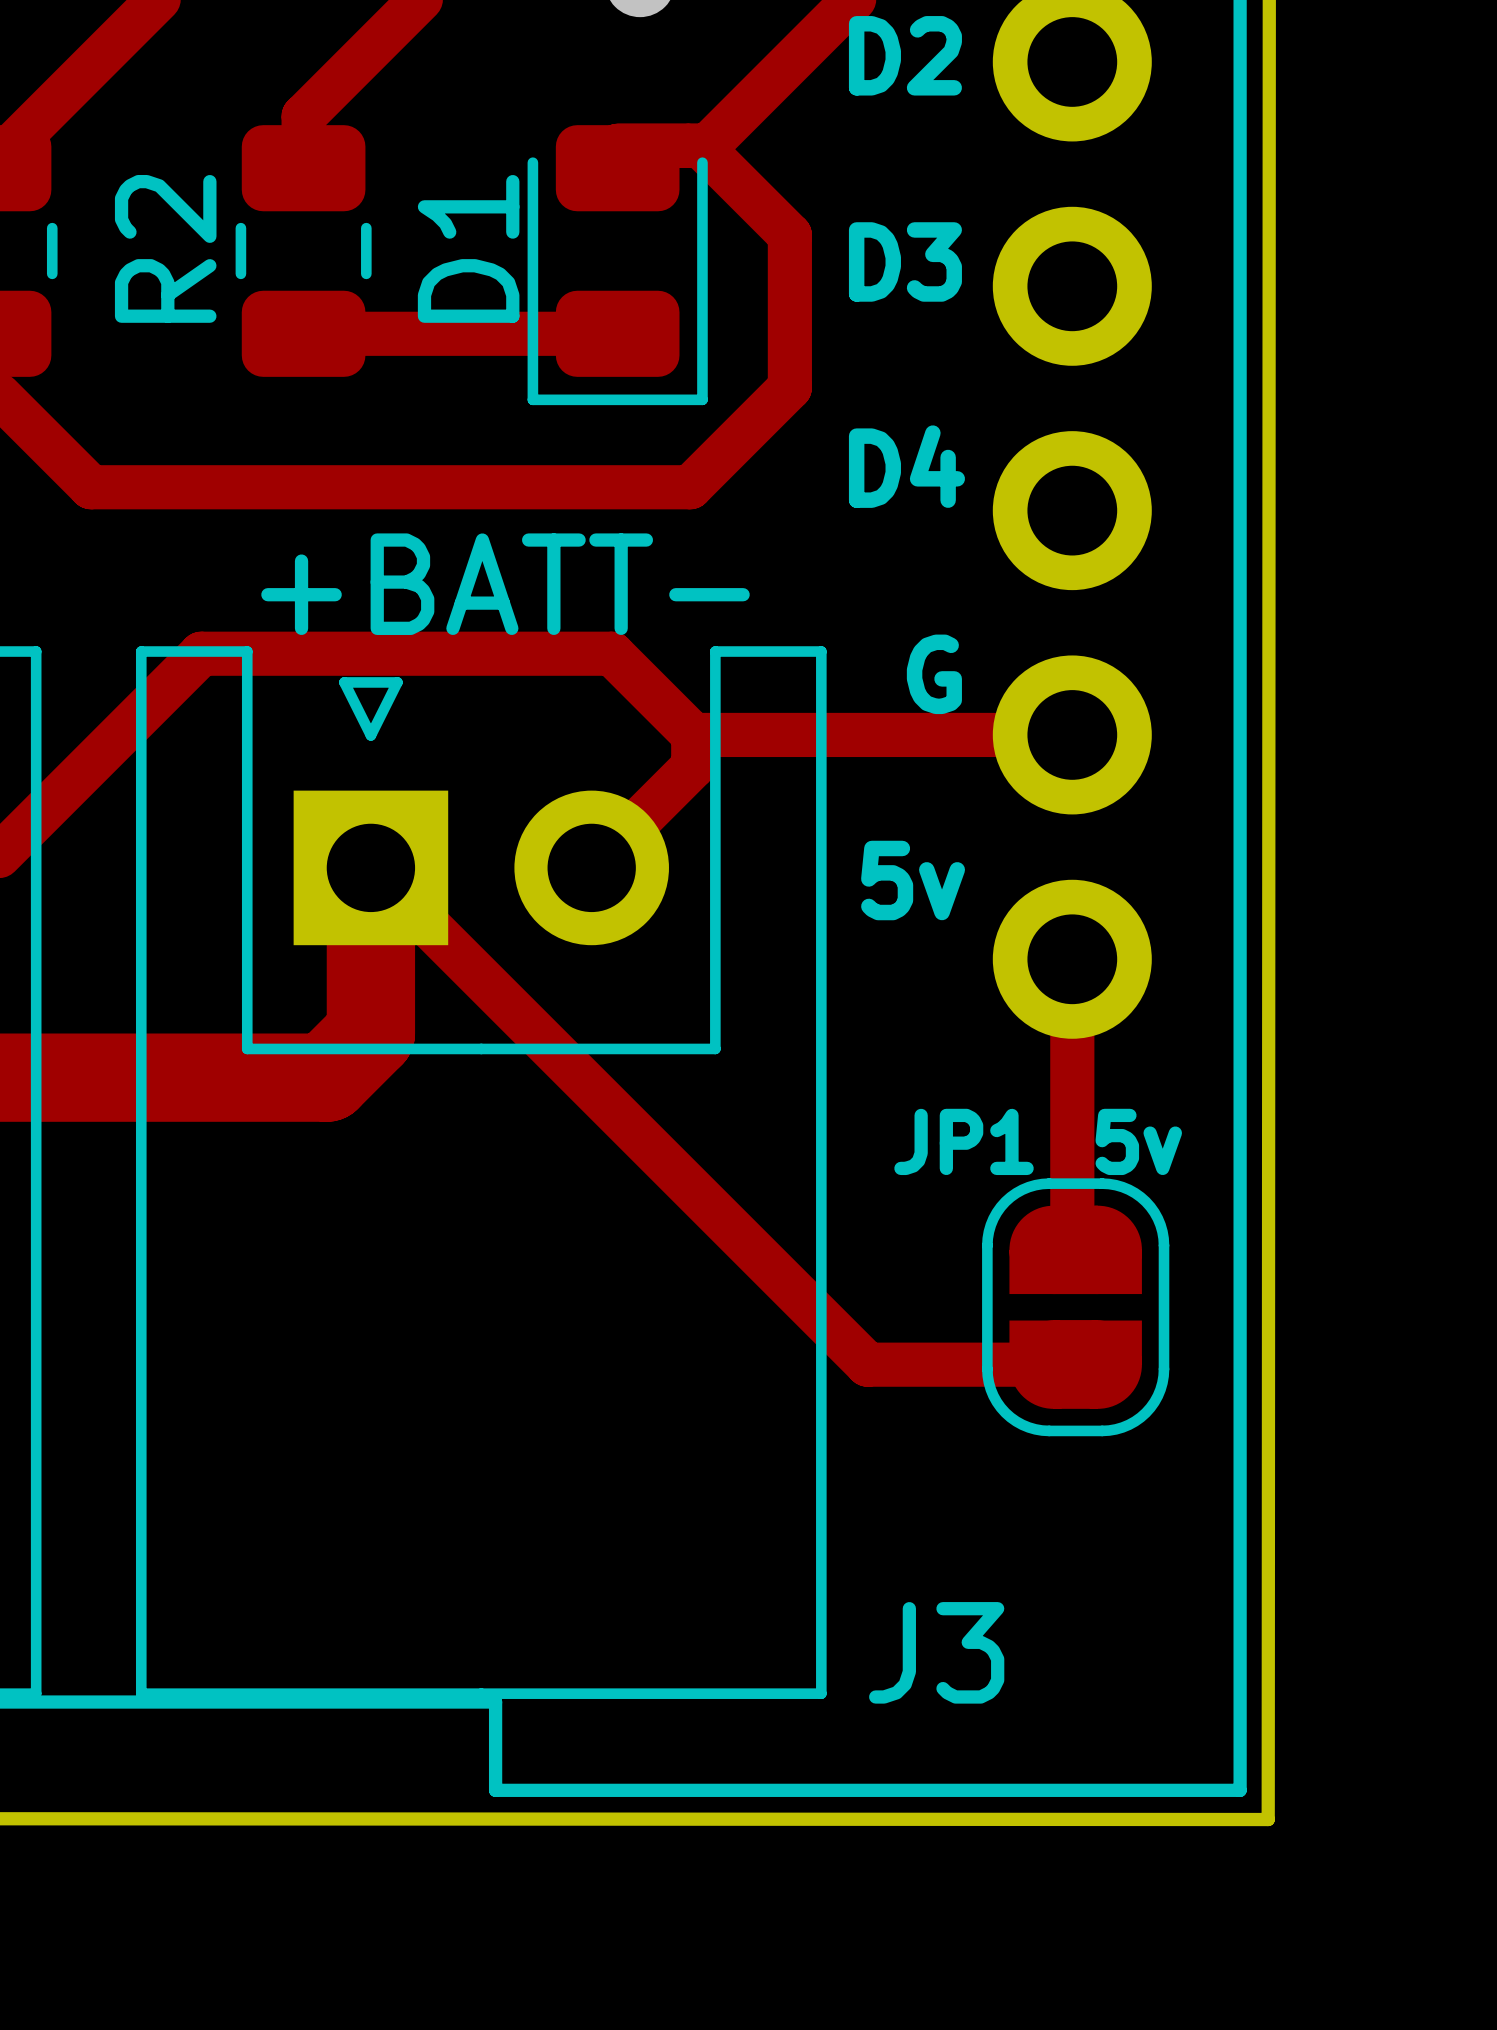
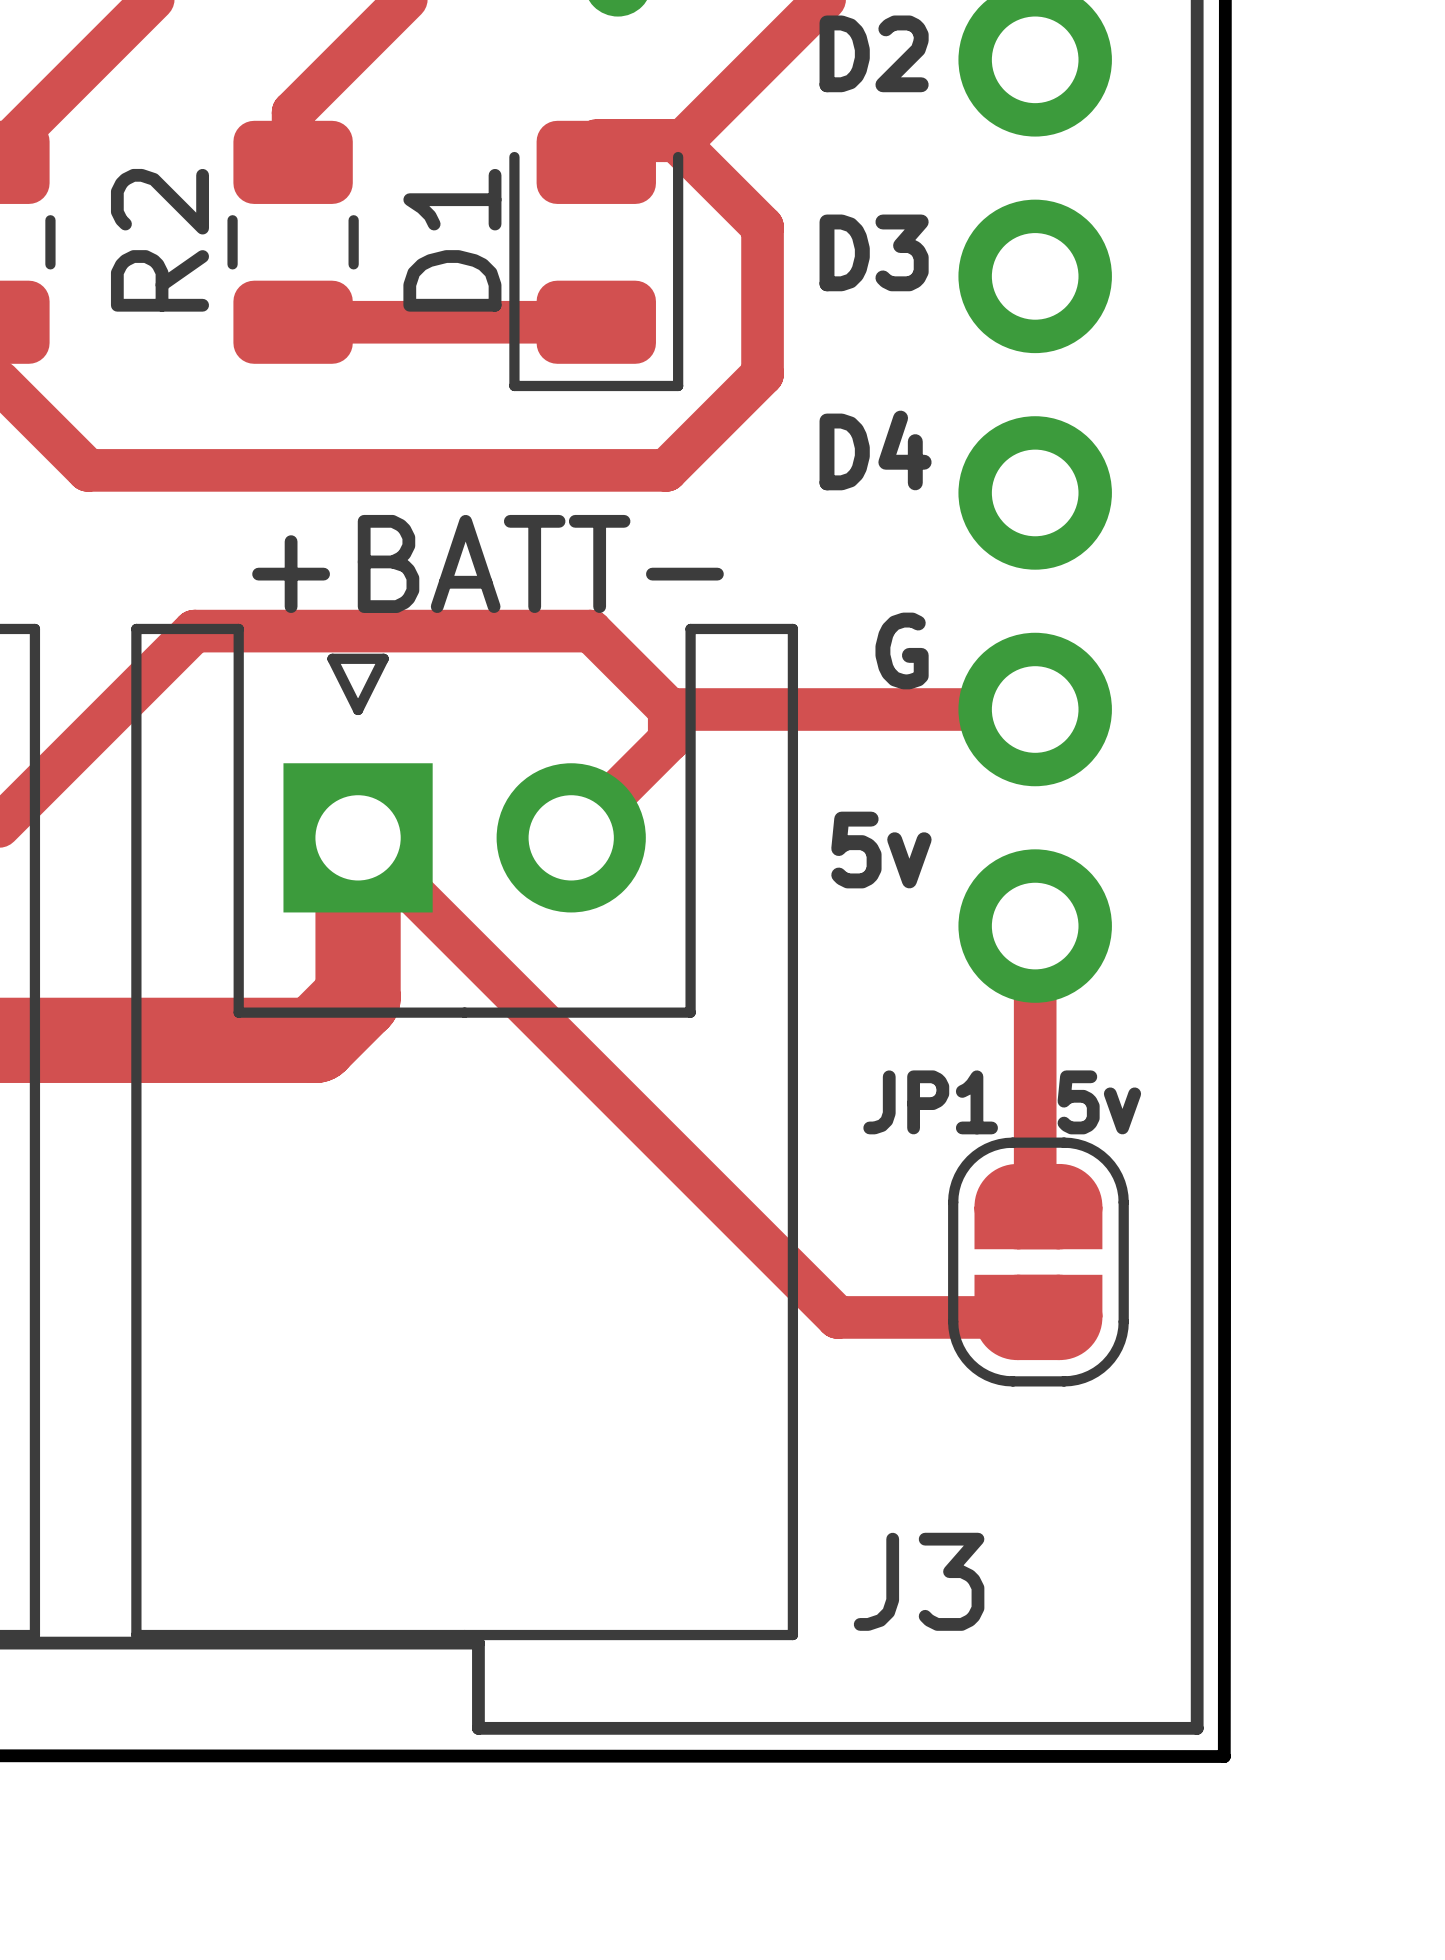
J3 name position: J3 (936, 1652) -> J3 (919, 1581)

